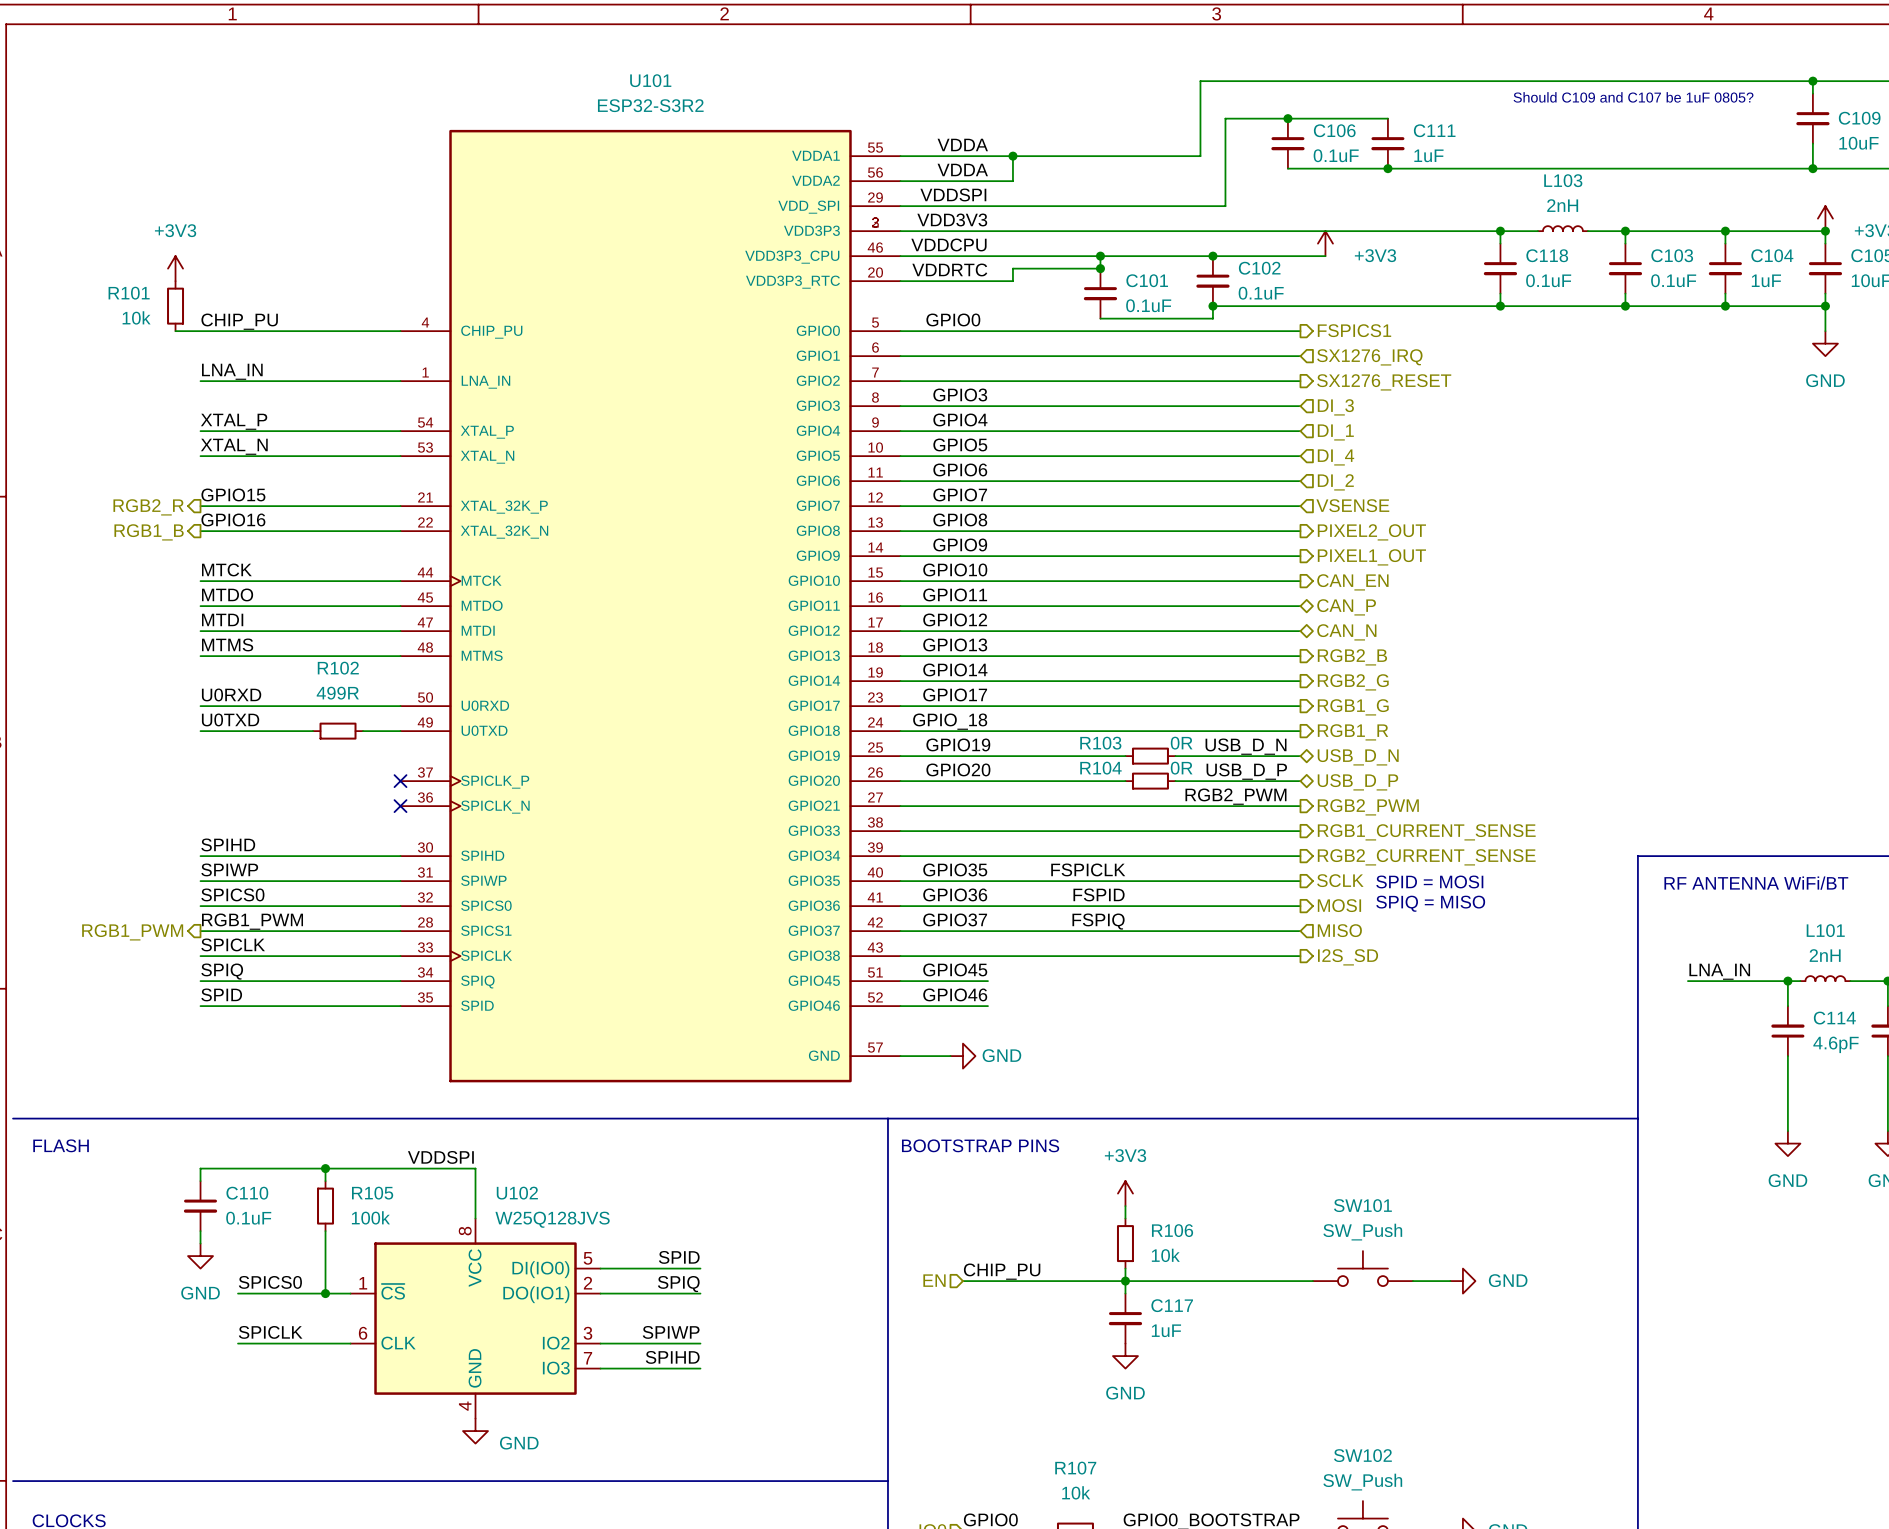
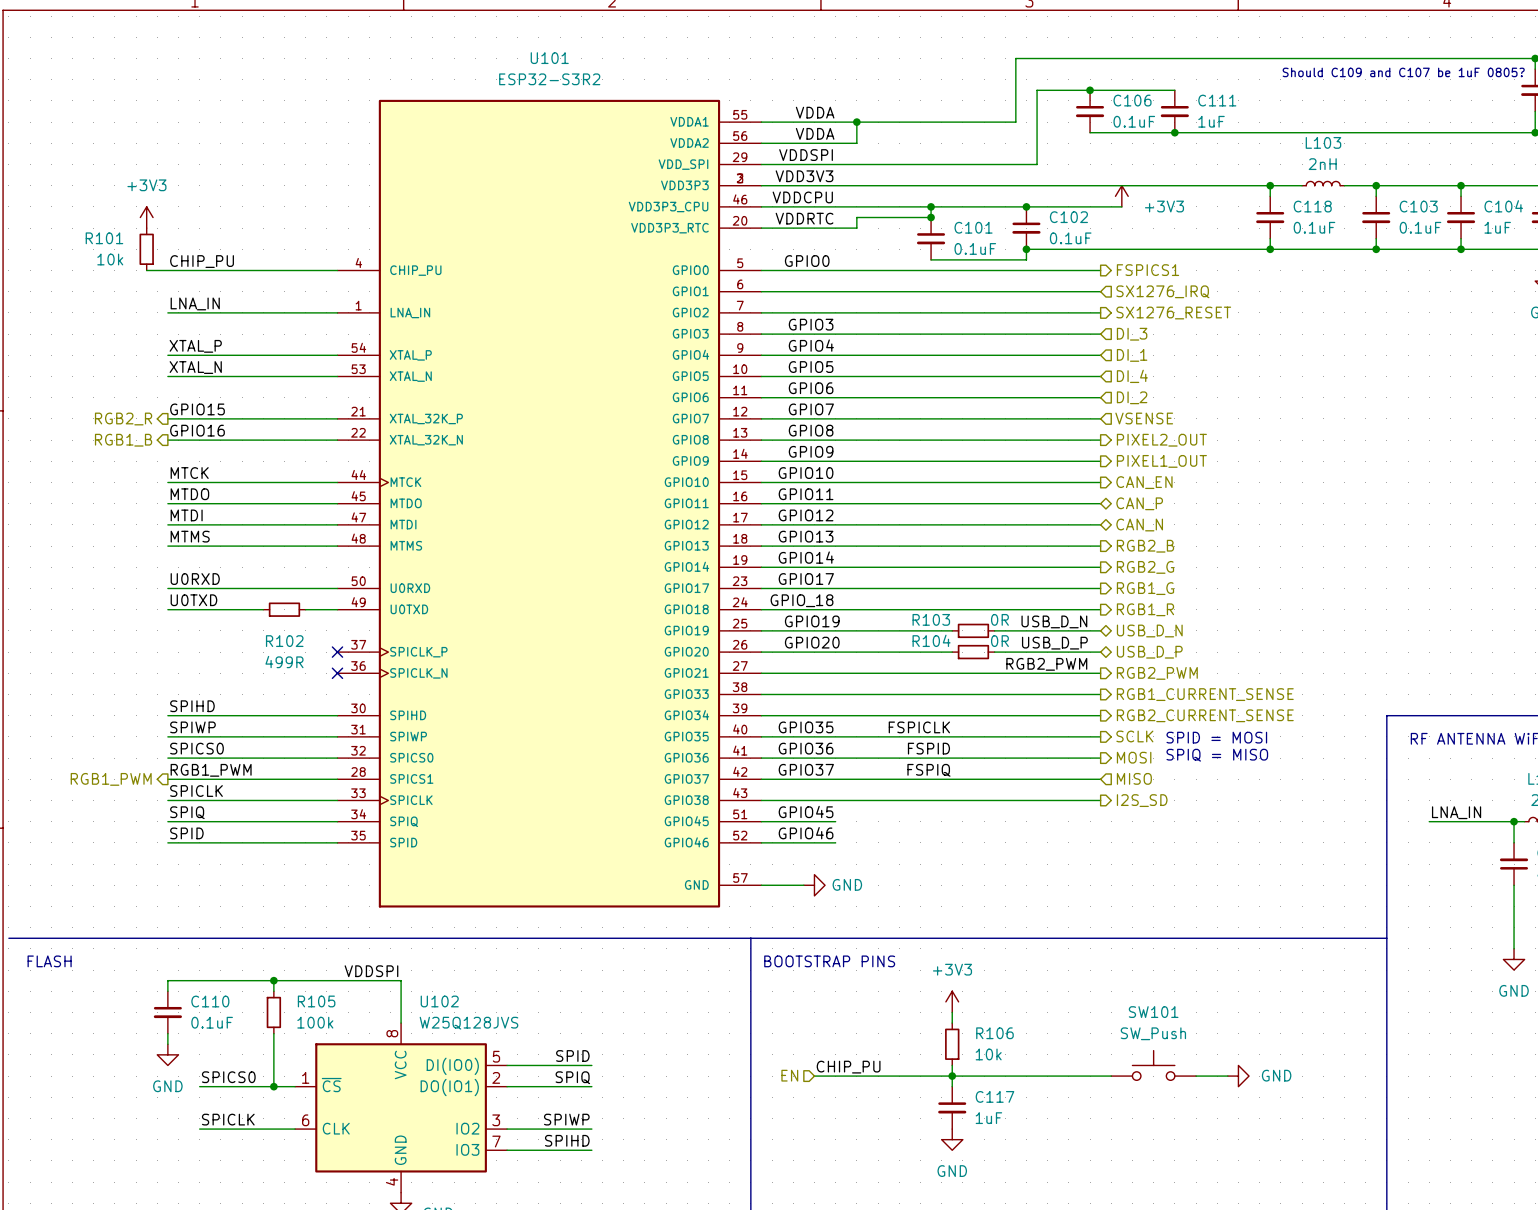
R102 name position: R102 (338, 668) -> R102 (284, 641)
R102 value position: 499R (337, 693) -> 499R (284, 662)

